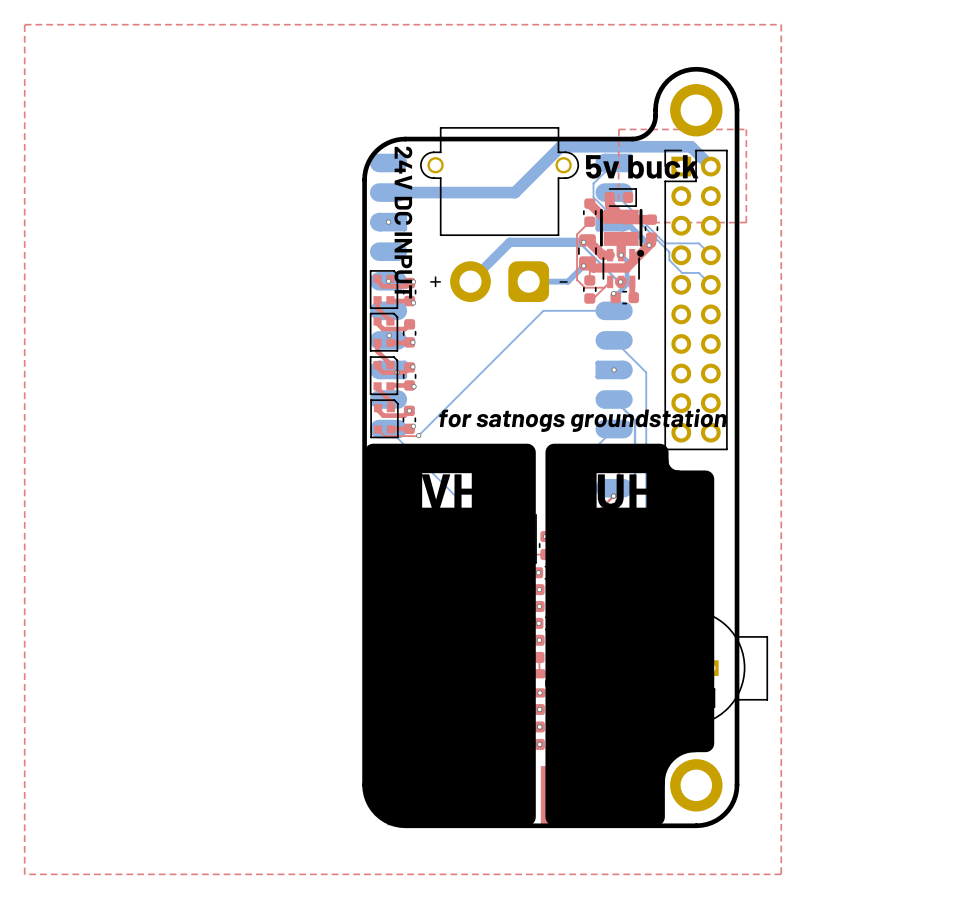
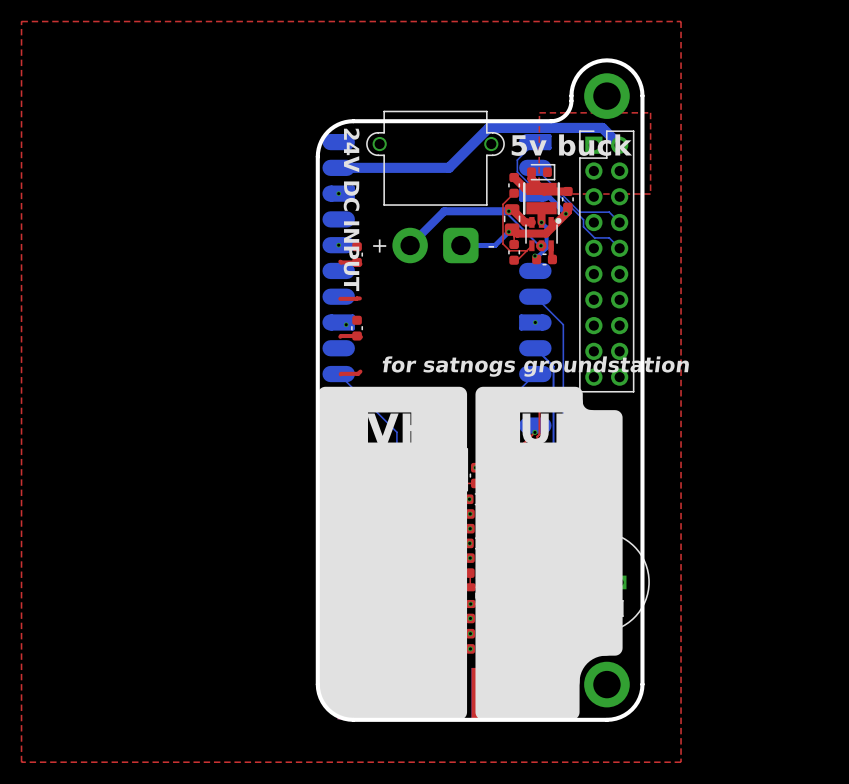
top track: (377, 278) (382, 286) (406, 286) (413, 281) -> none
via: (413, 281) -> none
part: (384, 289) -> none
top track: (377, 300) (377, 308) (390, 321) -> none
via: (413, 302) -> none
bottom track: (614, 310) (543, 310) (418, 435) -> none
top track: (377, 321) (382, 329) (404, 329) (409, 324) -> none
part: (384, 332) -> none
part: (409, 333) -> none
via: (389, 335) -> none
top track: (377, 342) (377, 351) (390, 365) -> none
via: (412, 342) -> none
top track: (377, 365) (382, 372) (404, 372) (412, 366) -> none
via: (412, 366) -> none
part: (384, 375) -> none
top track: (377, 386) (390, 401) (390, 408) -> none
via: (414, 386) -> none
top track: (378, 408) (383, 415) (404, 415) (409, 410) -> none
via: (409, 410) -> none
part: (384, 418) -> none
part: (409, 419) -> none
via: (413, 426) -> none
top track: (378, 429) (384, 436) (418, 435) -> none
via: (418, 435) -> none
line: (735, 636) (767, 636) (767, 699) (735, 699) (735, 636) -> none

